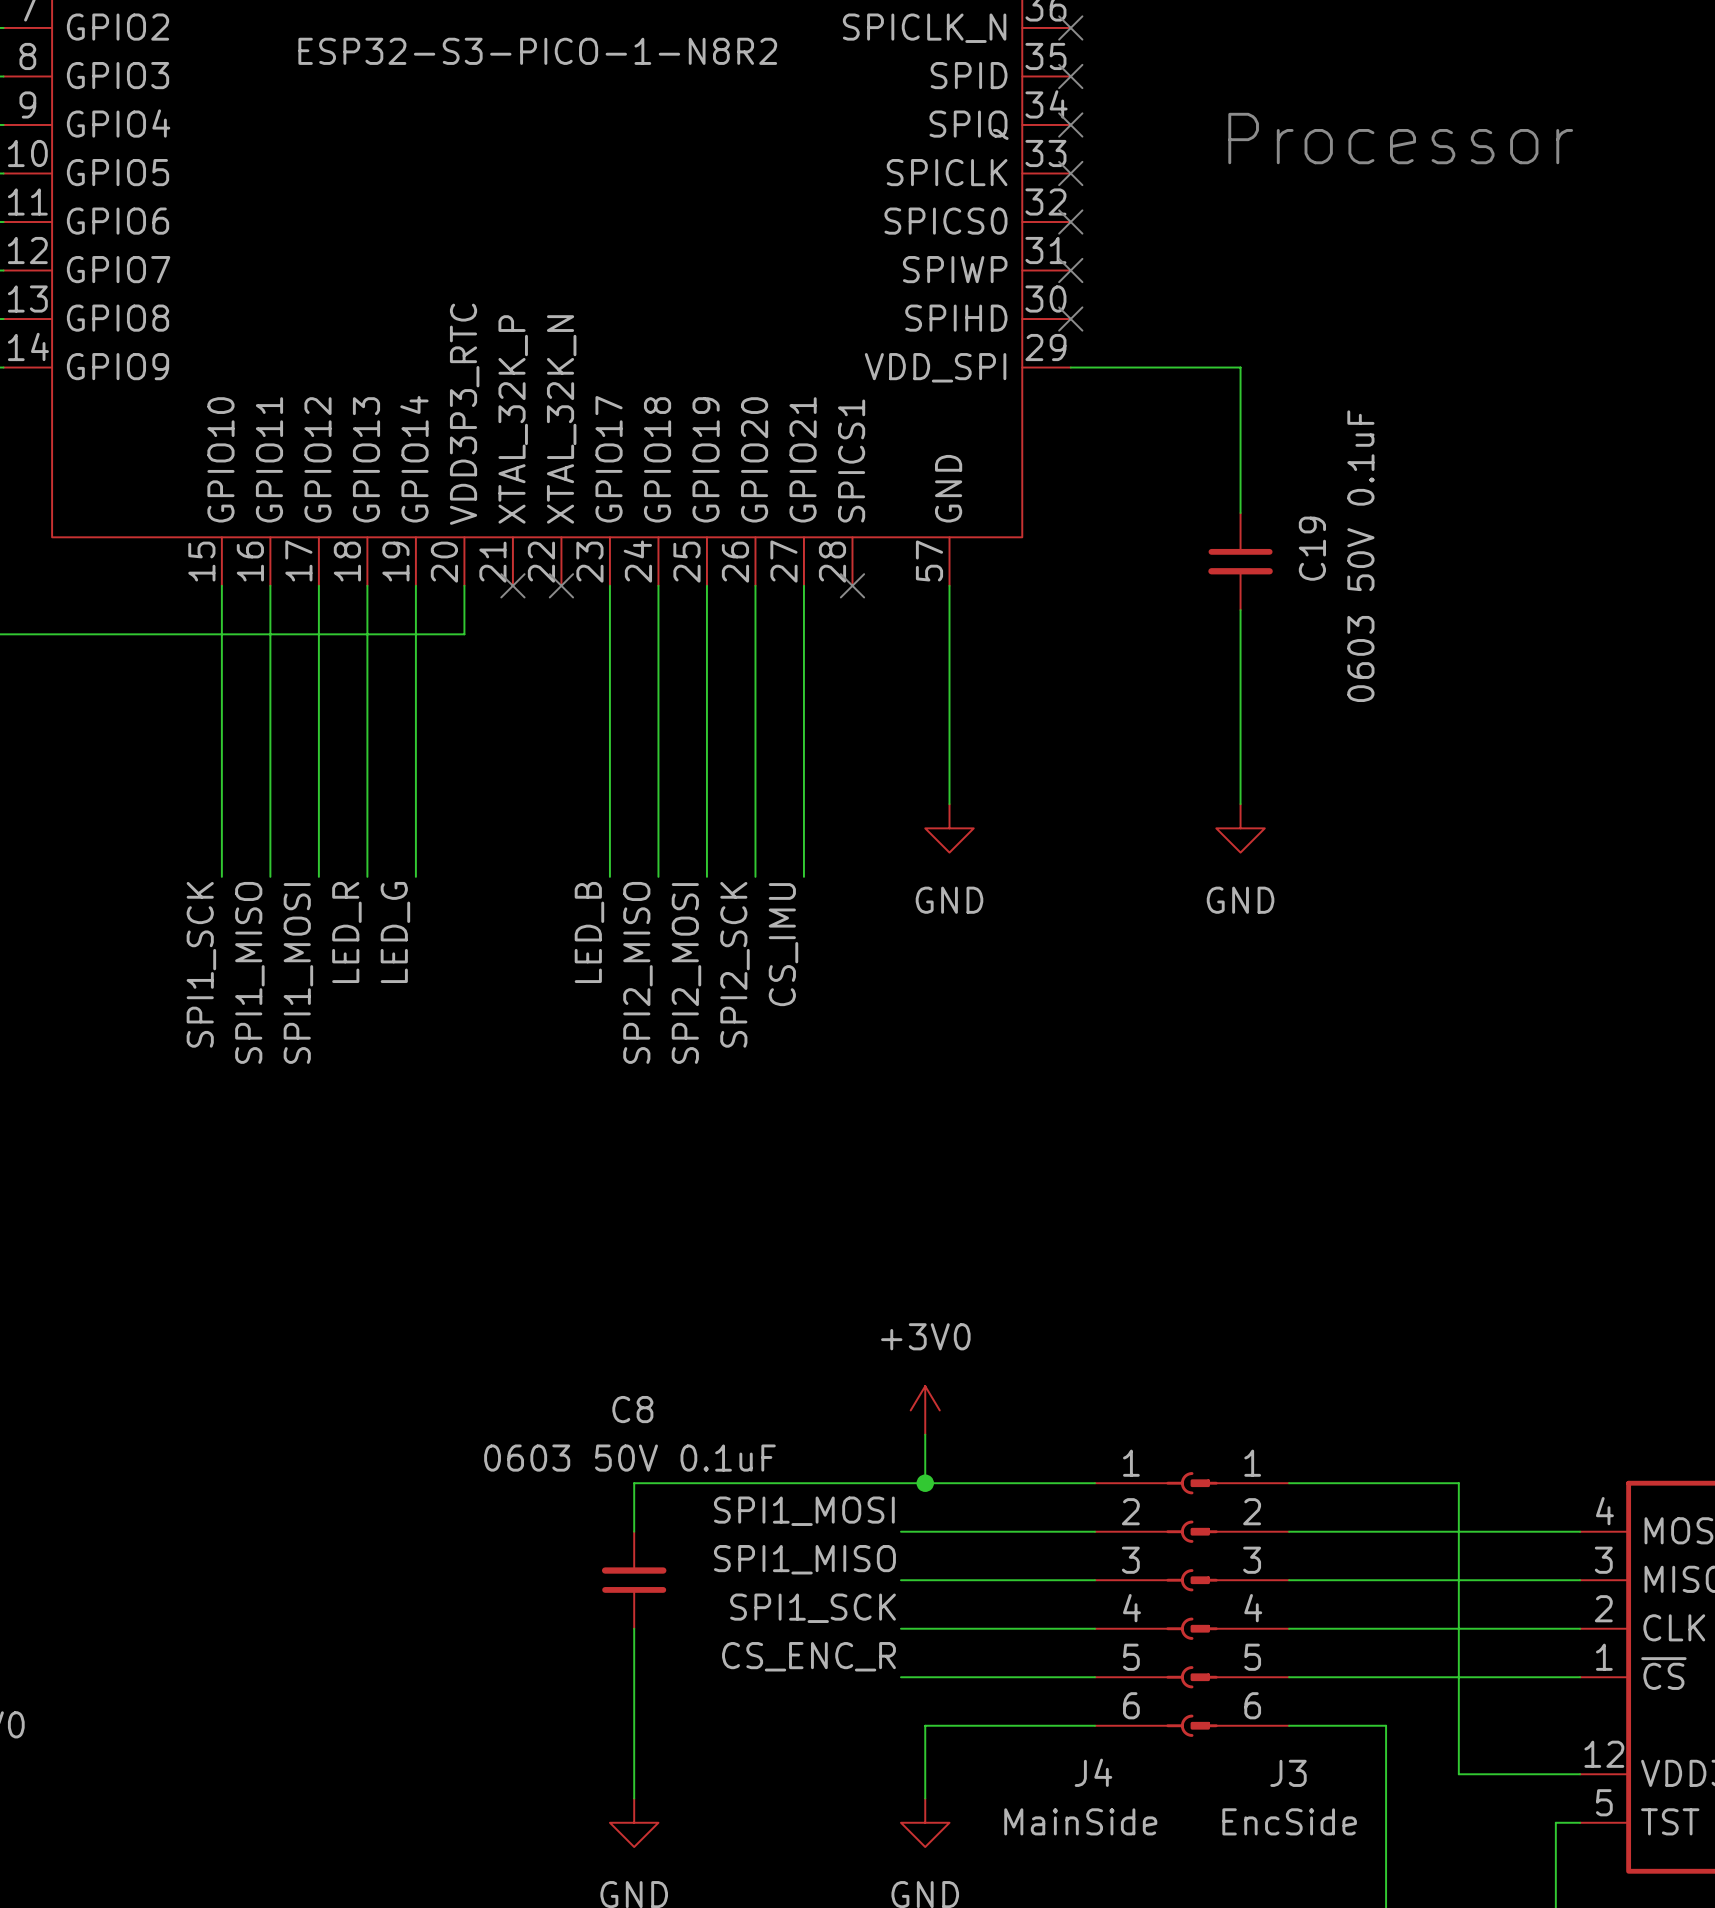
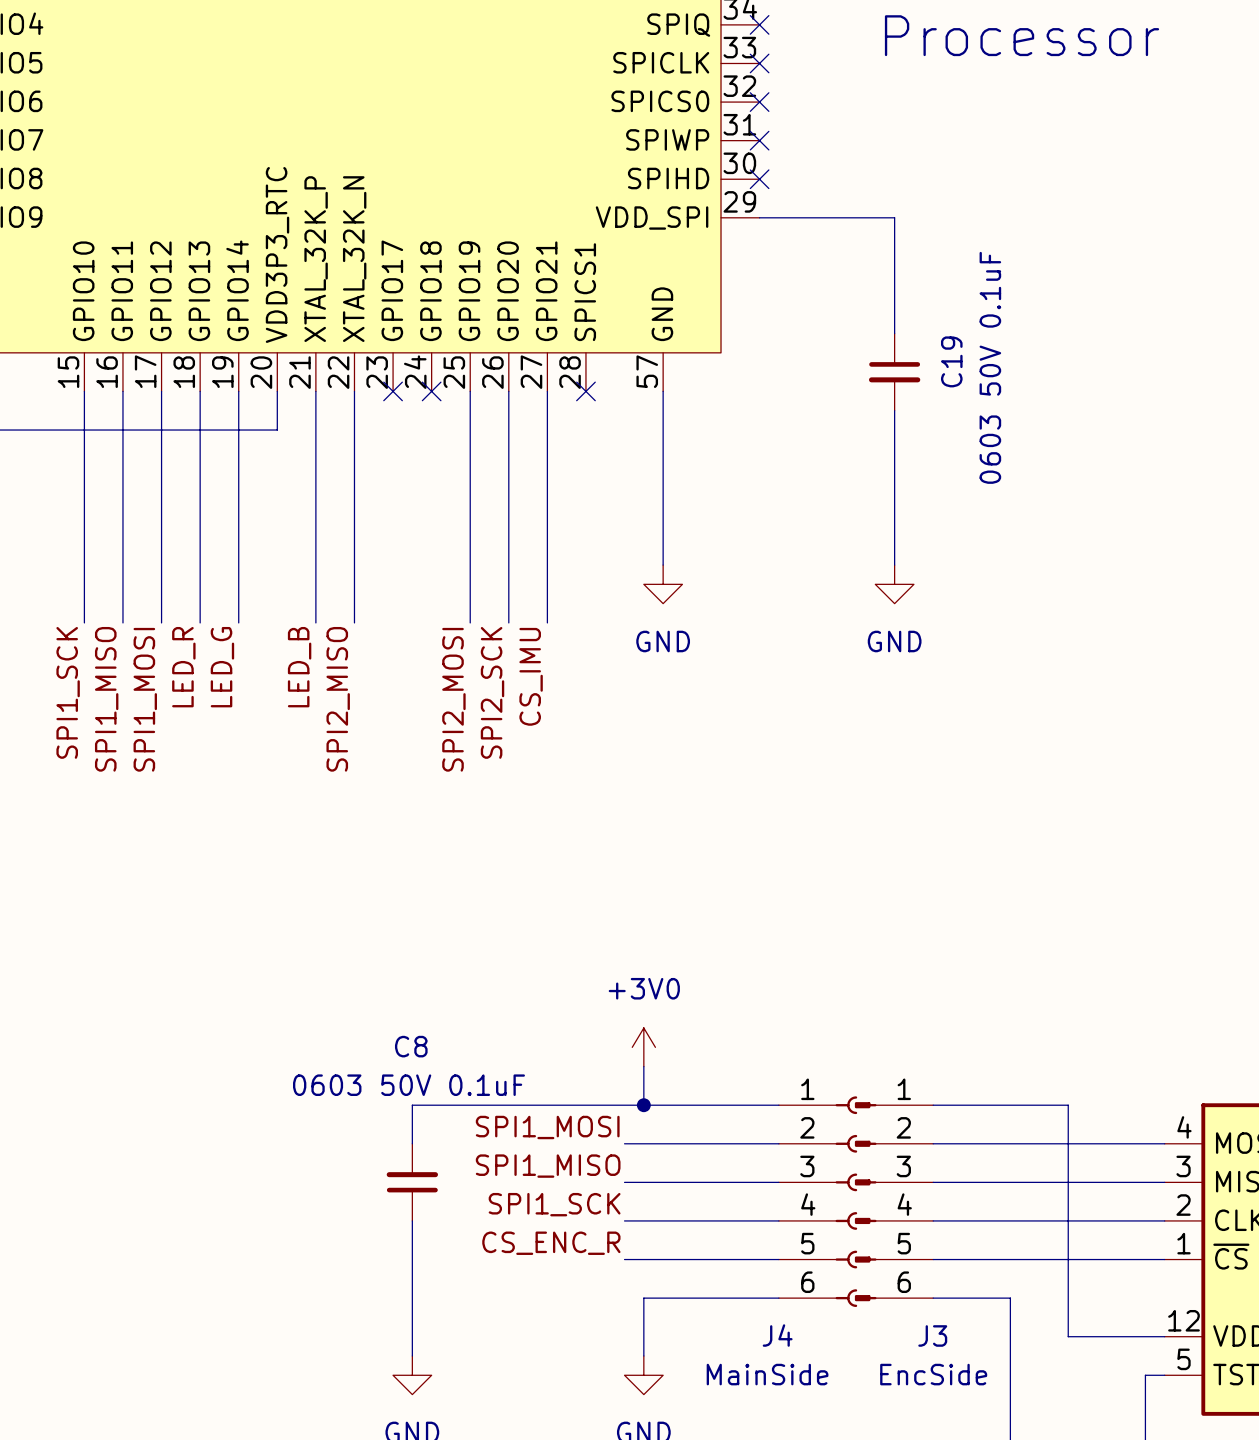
no-connect mark: (512, 585) -> none
no-connect mark: (561, 585) -> none
wire: (609, 585) (609, 876) -> (354, 391) (354, 622)
no-connect mark: none -> (393, 391)
wire: (658, 585) (658, 876) -> (315, 391) (315, 622)
no-connect mark: none -> (431, 391)
label position: LED_B (589, 932) -> LED_B (299, 667)
label position: SPI2_MISO (637, 972) -> SPI2_MISO (338, 699)

